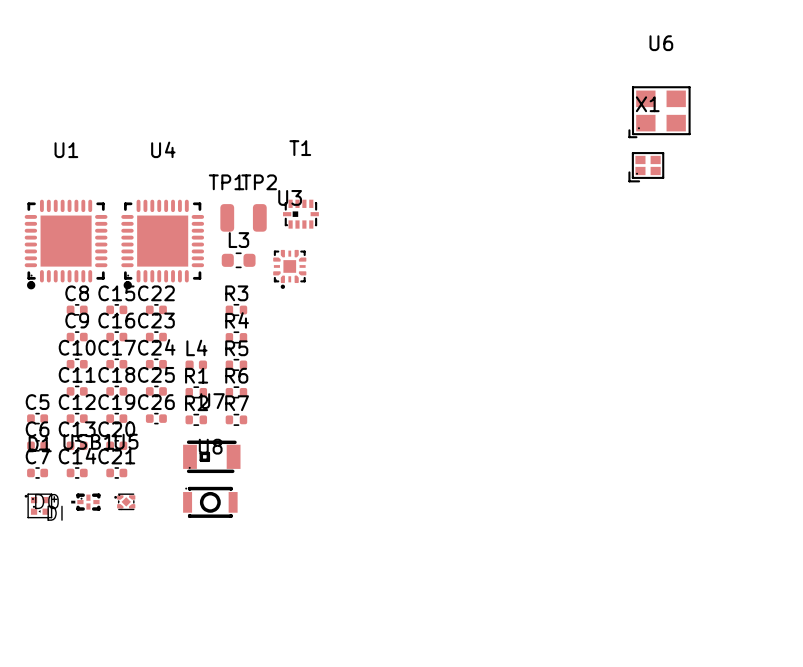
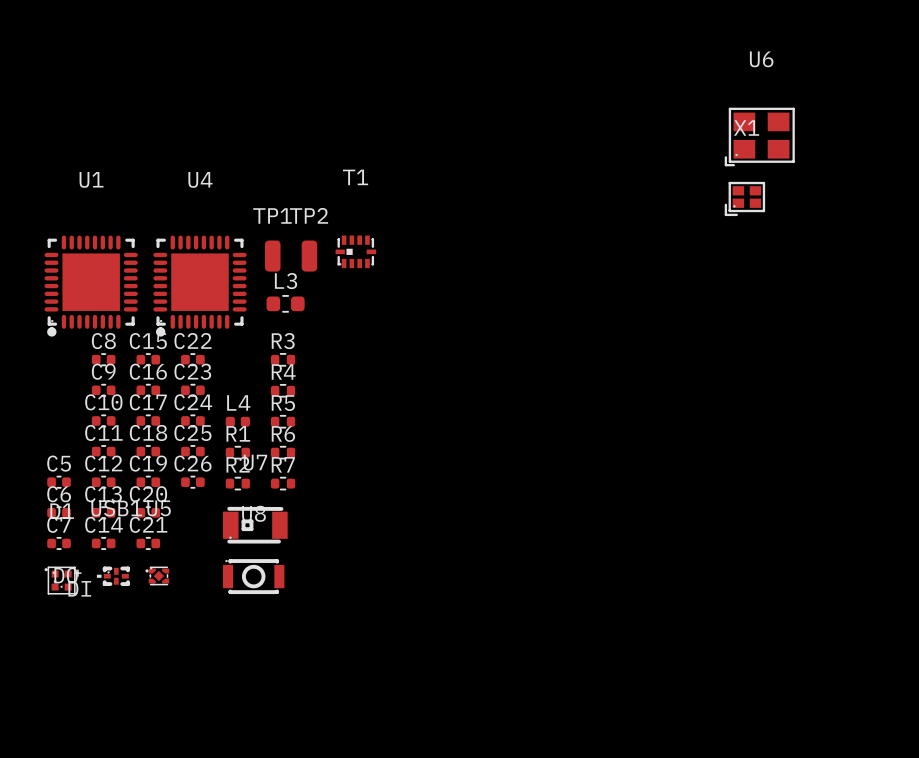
U3: (289, 269) -> none

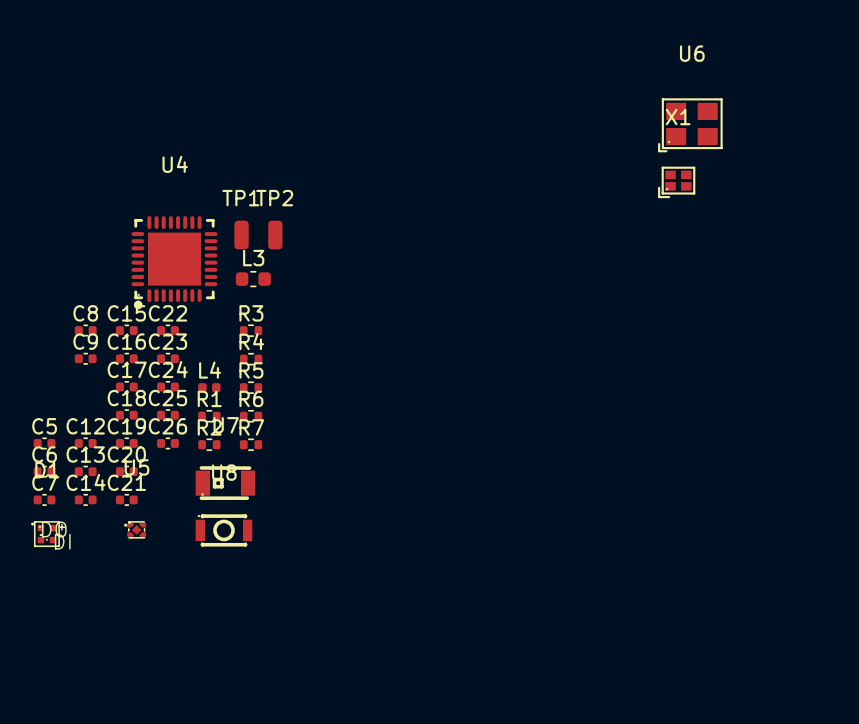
T1: (355, 251) -> none
U1: (91, 286) -> none
C10: (103, 420) -> none
C11: (103, 451) -> none
USB1: (113, 576) -> none

